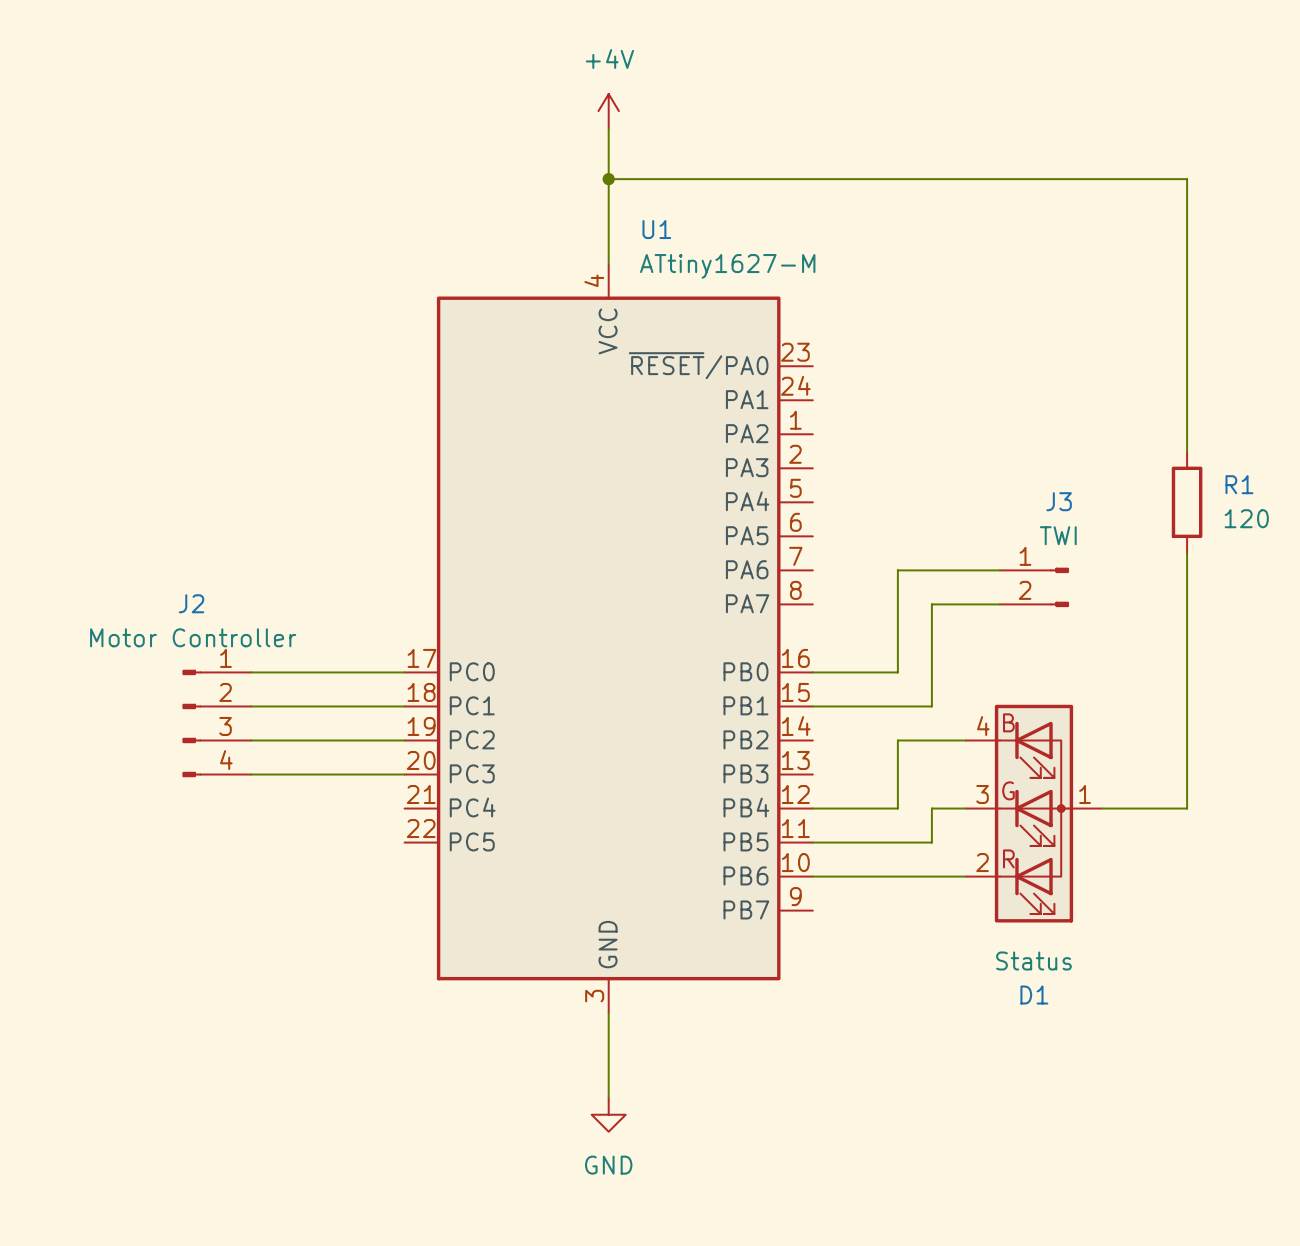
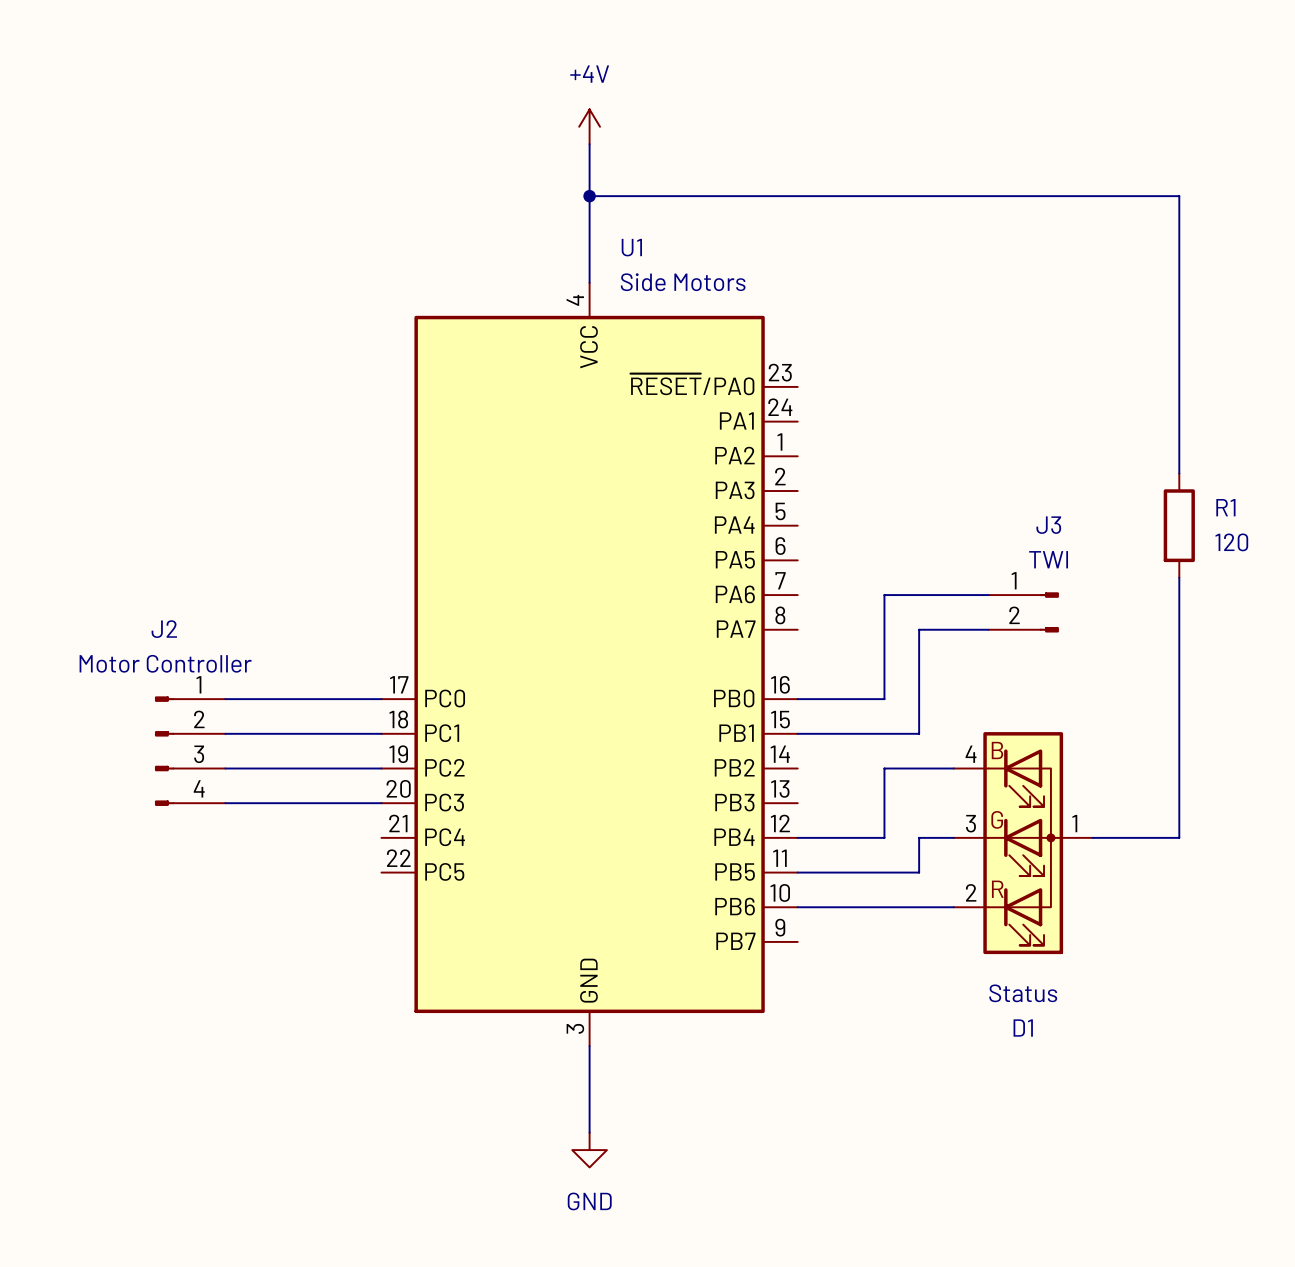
U1 value: ATtiny1627-M (727, 266) -> Side Motors (683, 282)

